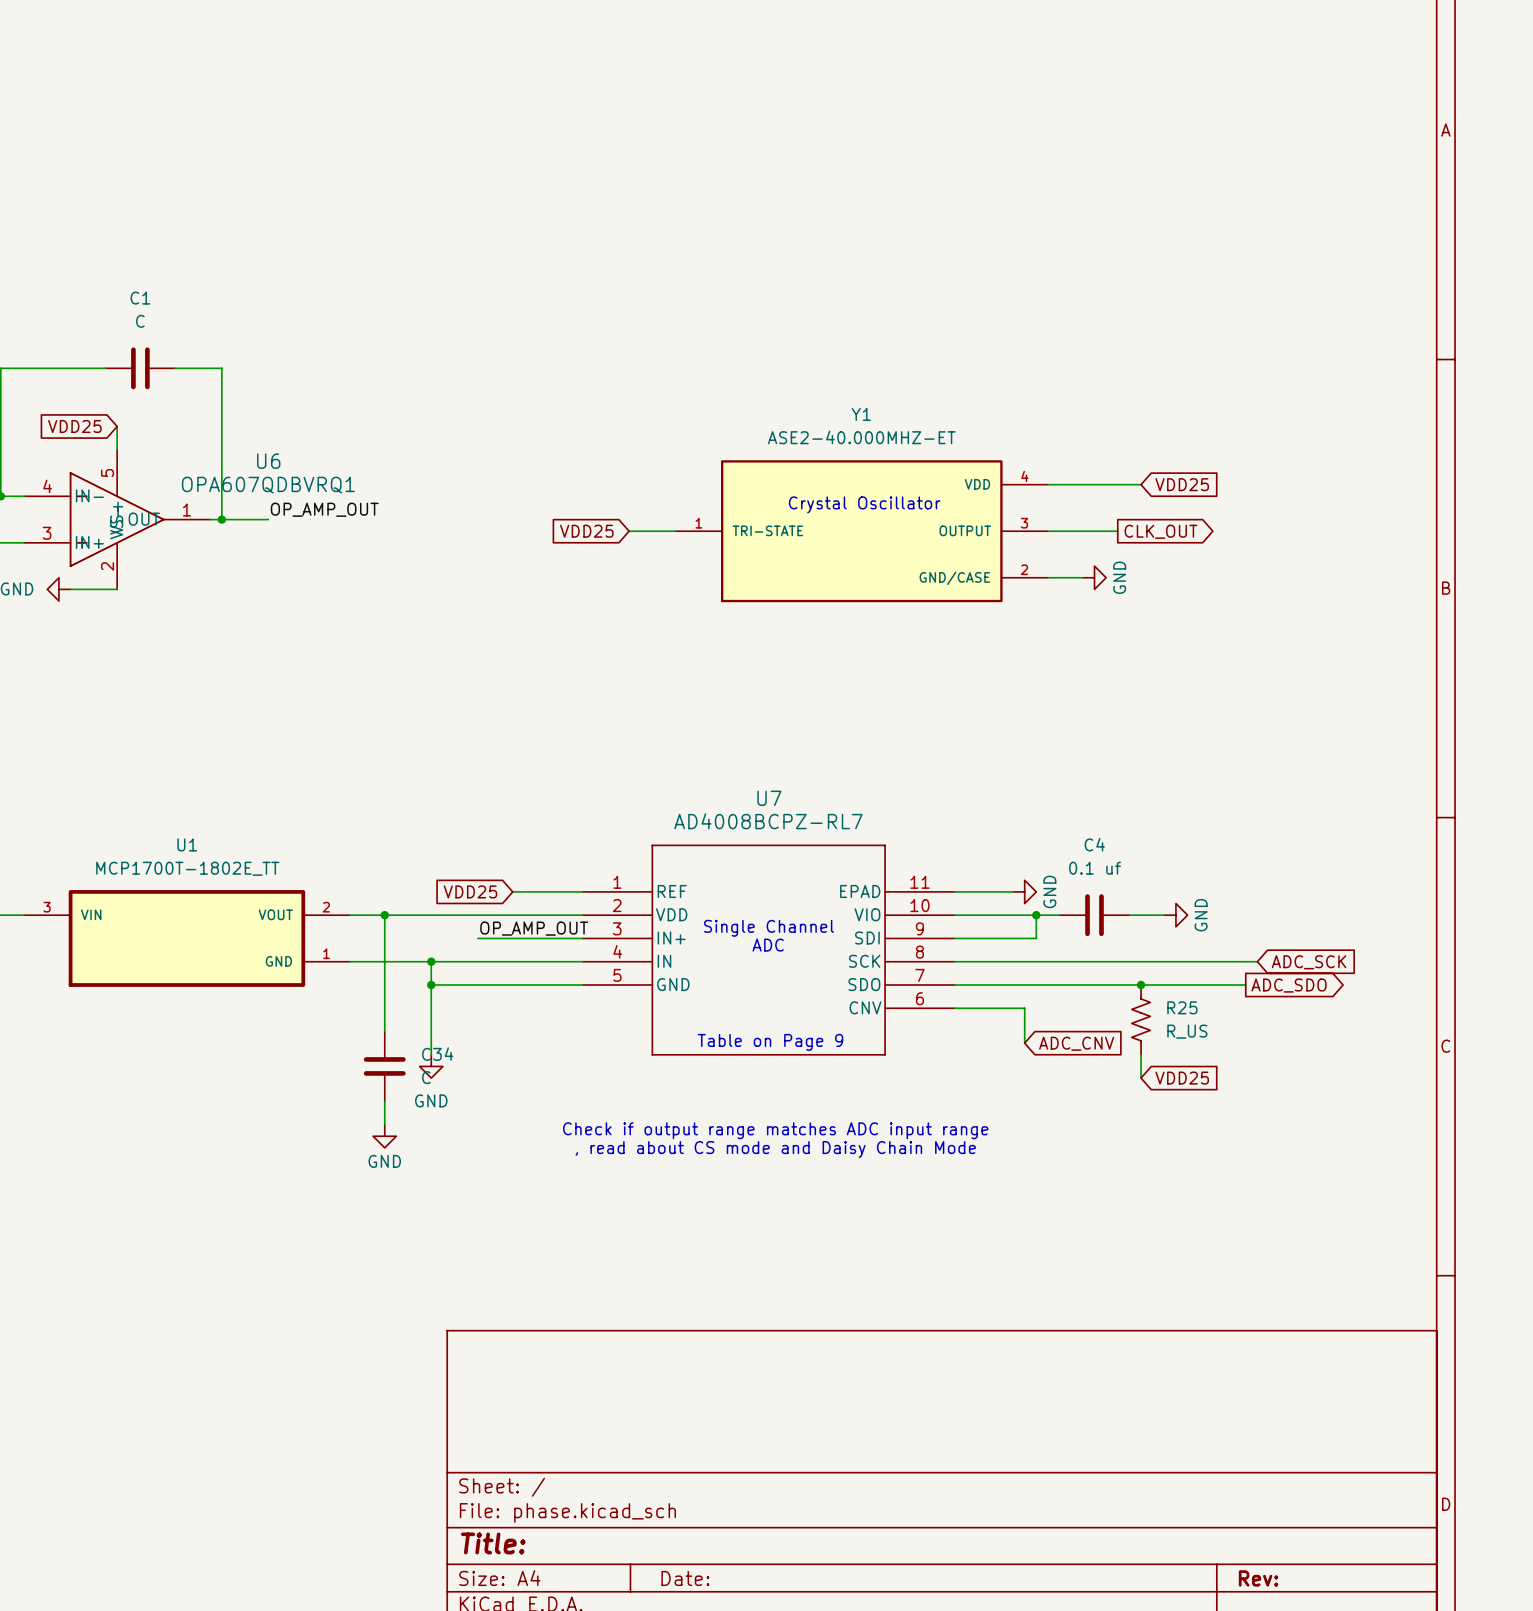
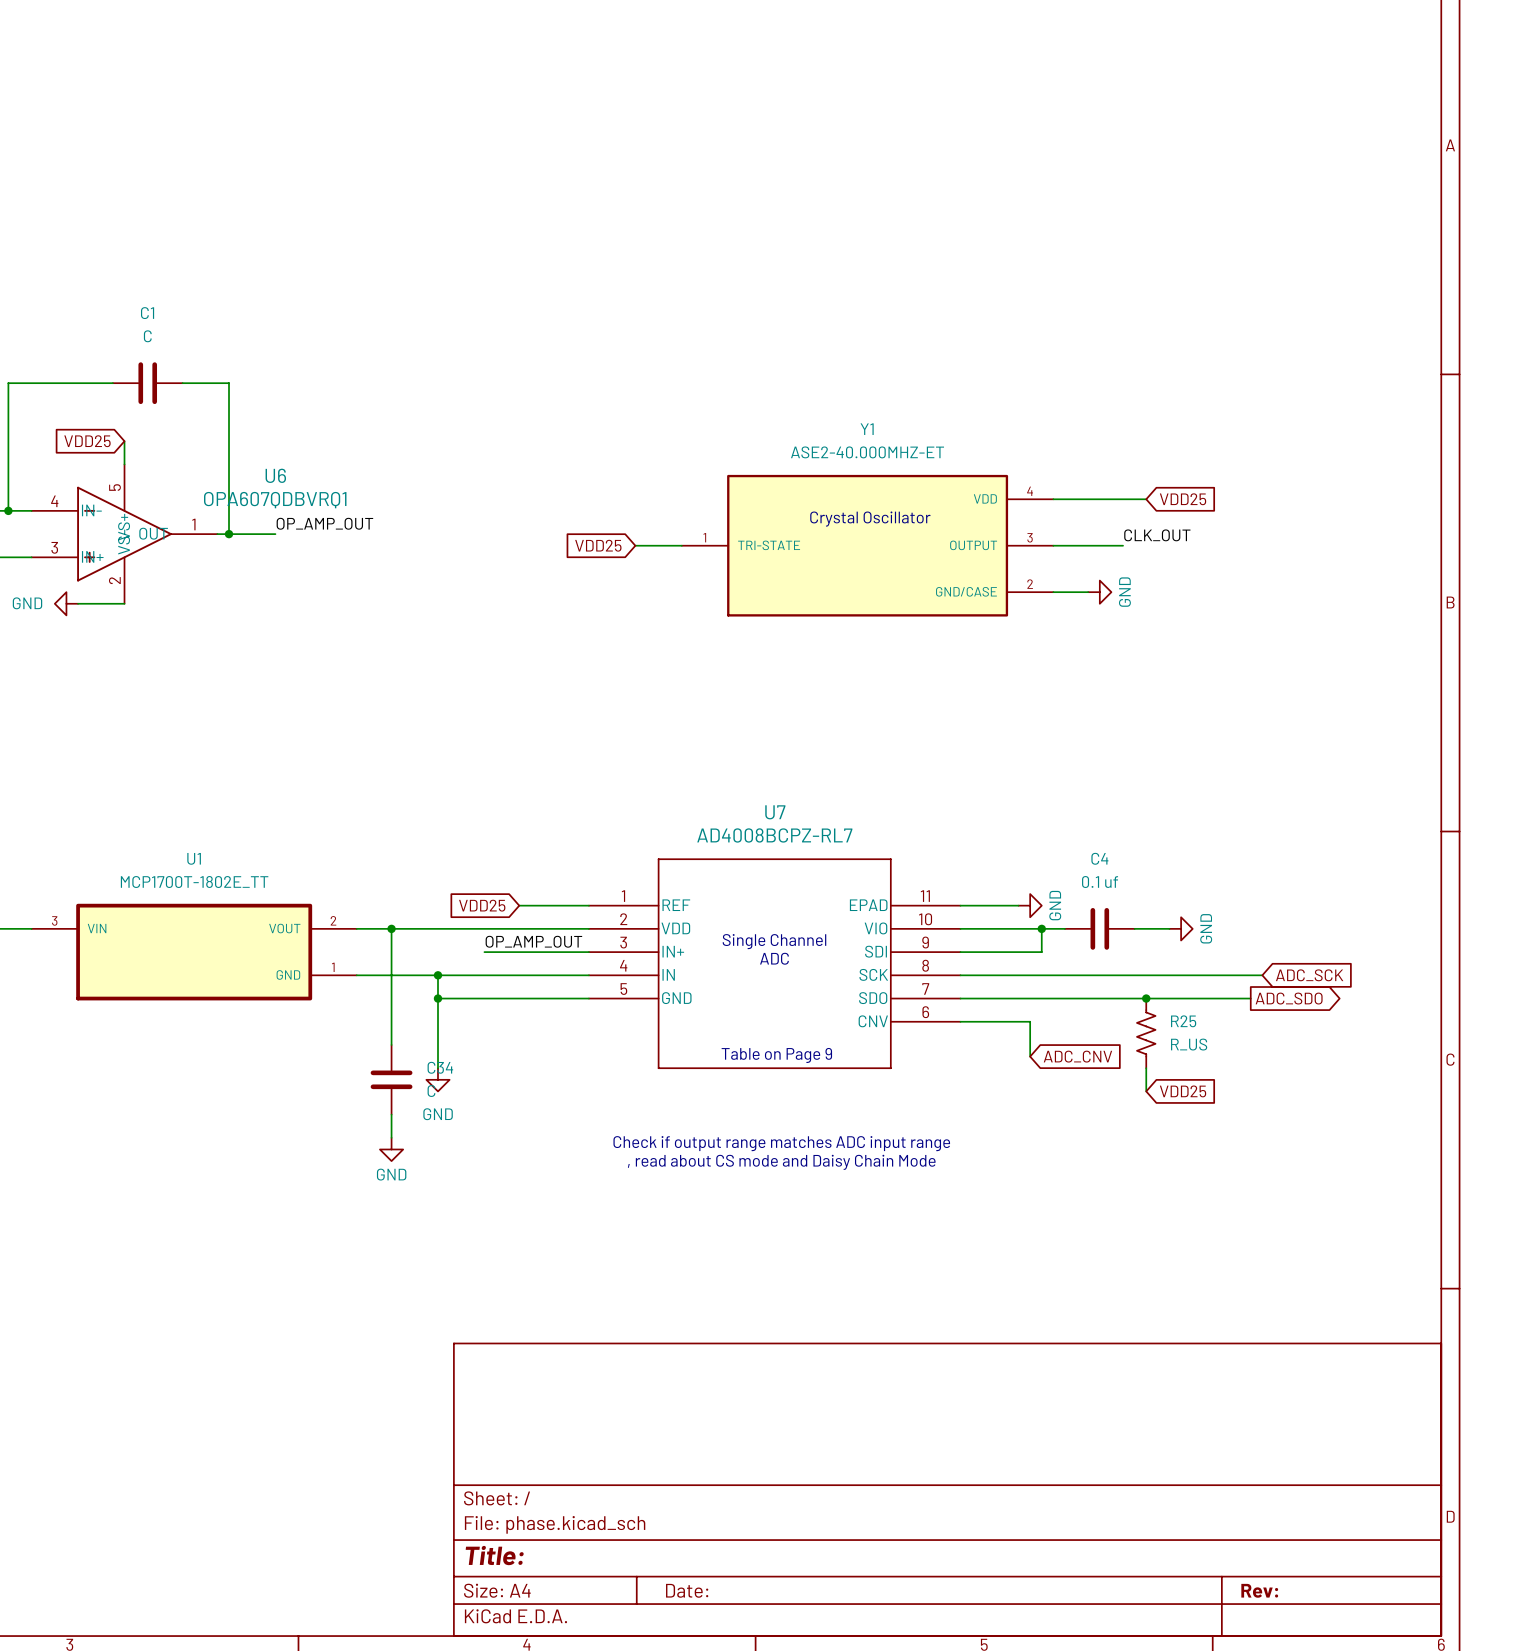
label: none -> CLK_OUT (1157, 535)
global label: CLK_OUT (1161, 531) -> none

